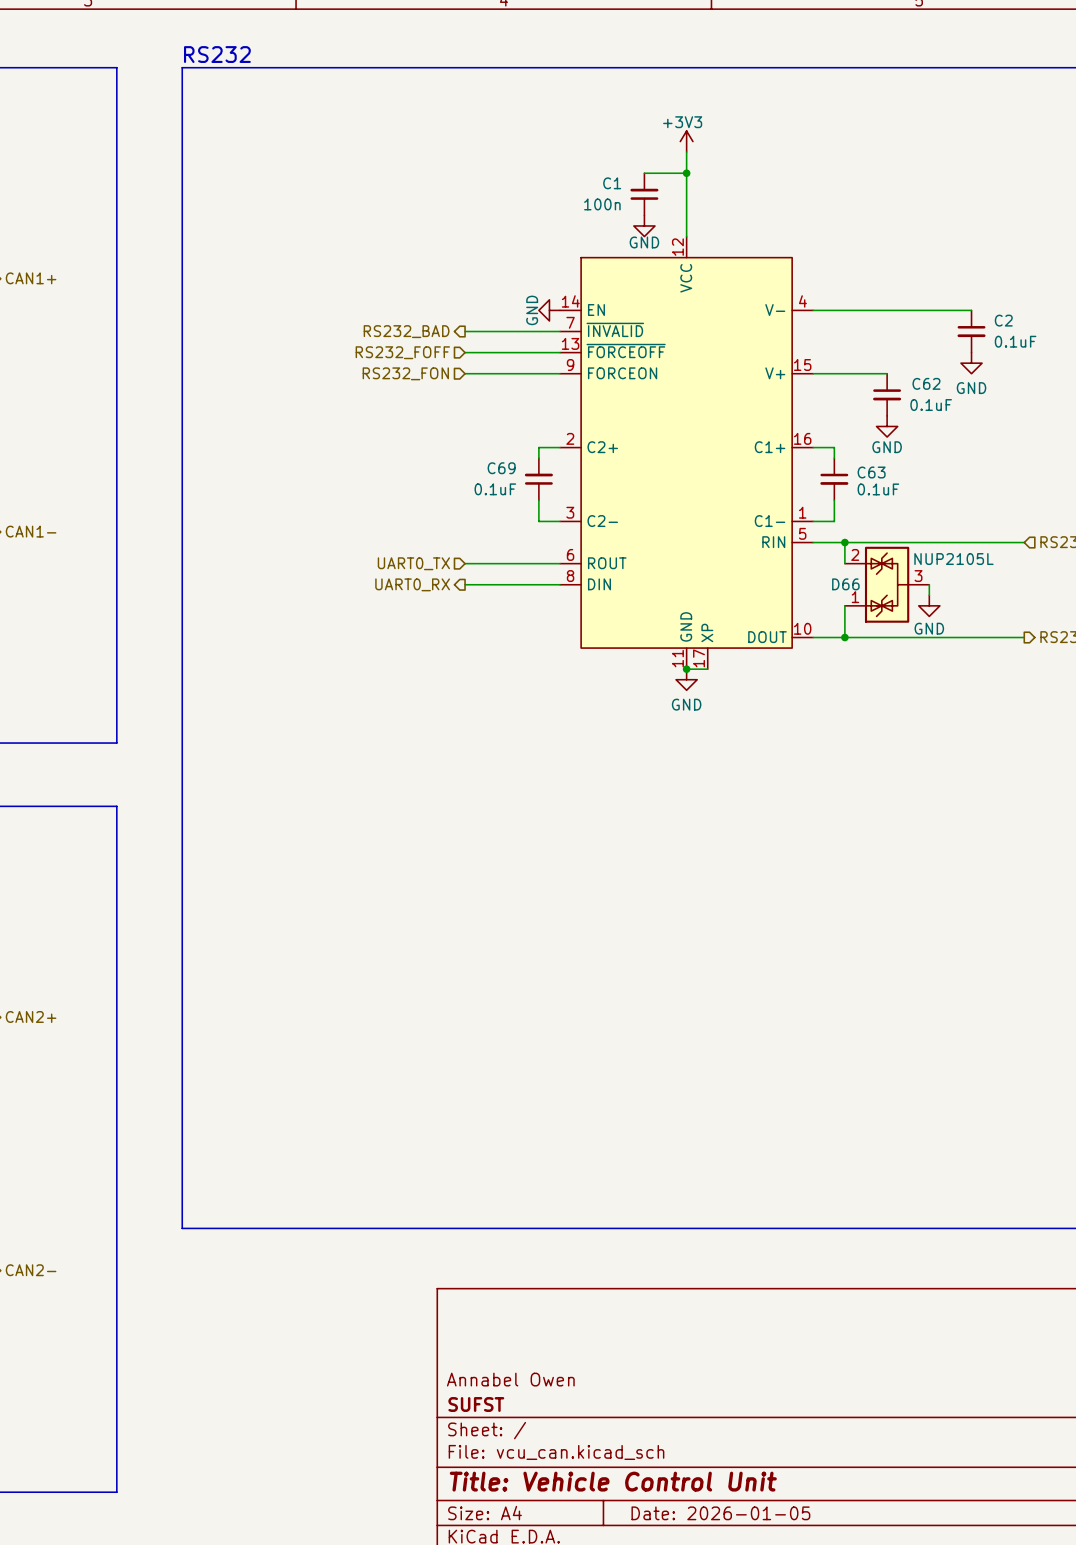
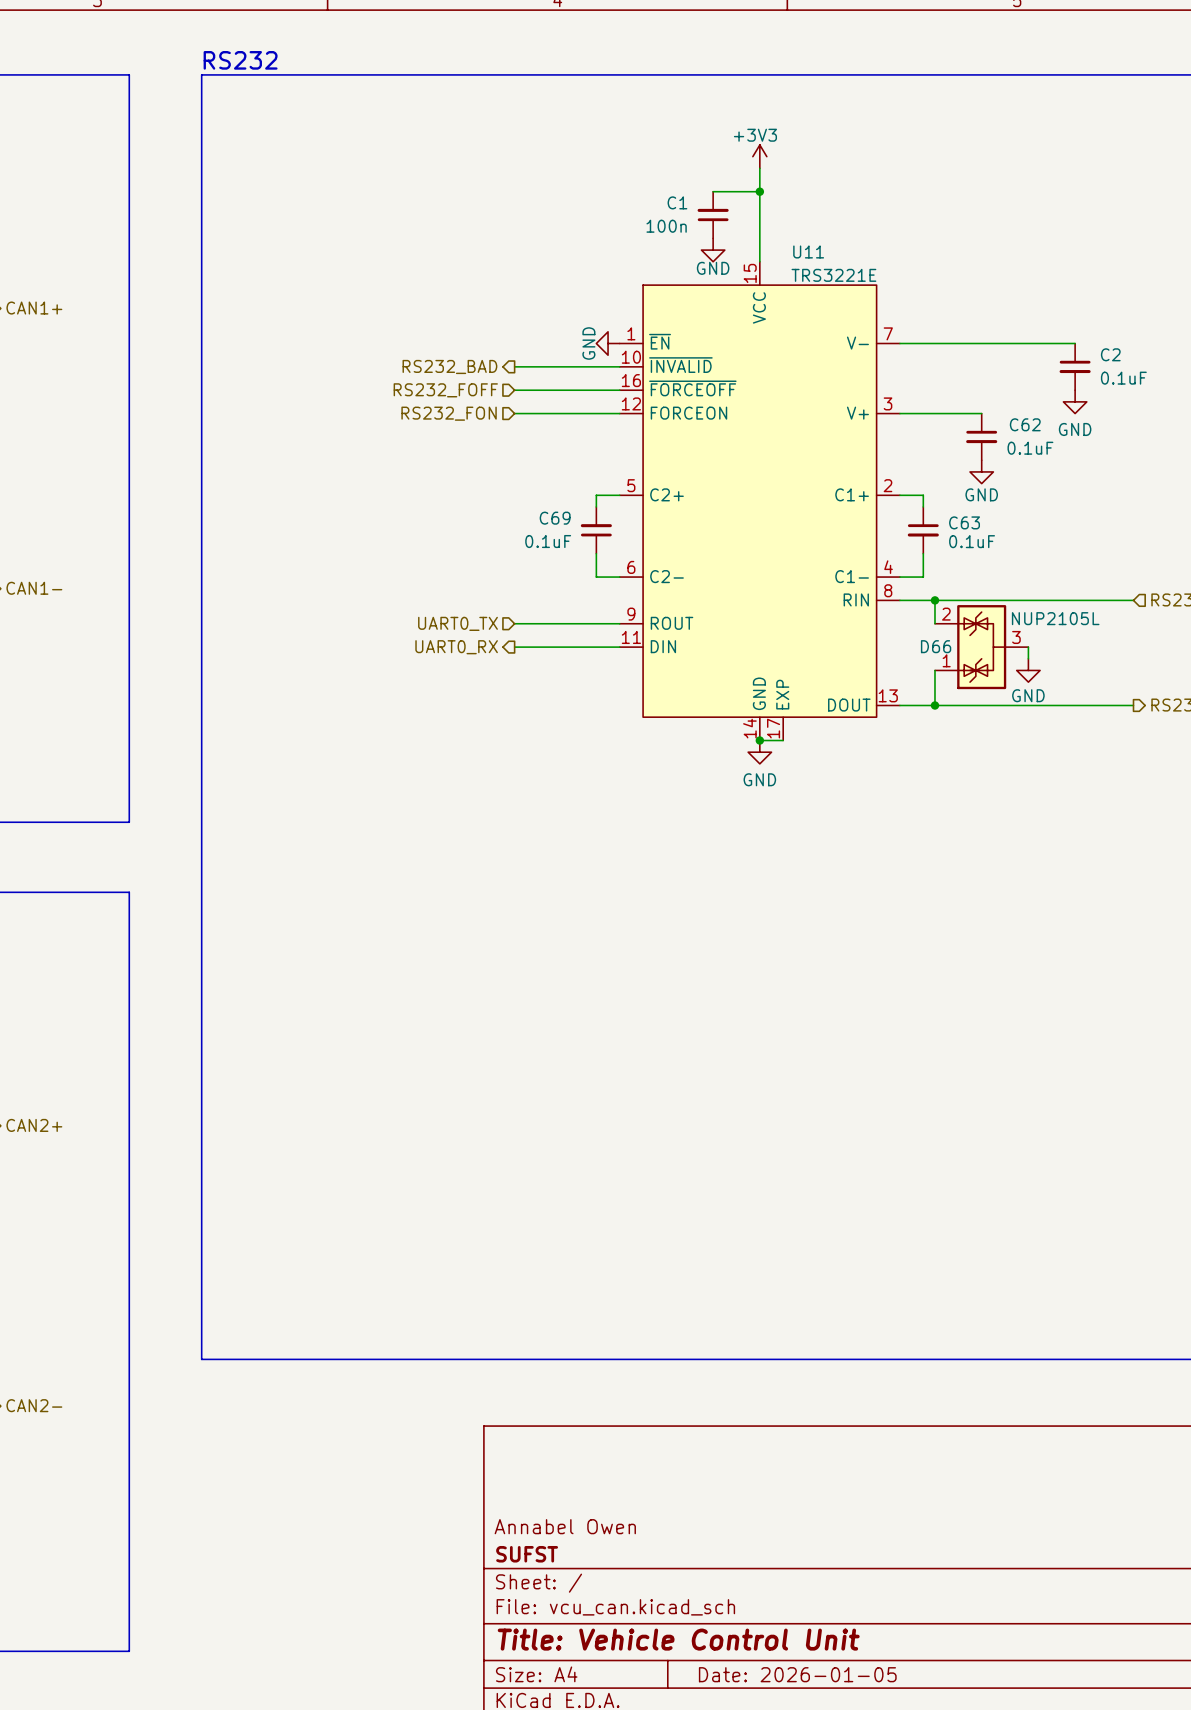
U11 name: none -> U11 (808, 251)
U11 symbol: [560, 236, 814, 670] -> [619, 261, 900, 741]
U11 value: none -> TRS3221E (833, 275)

